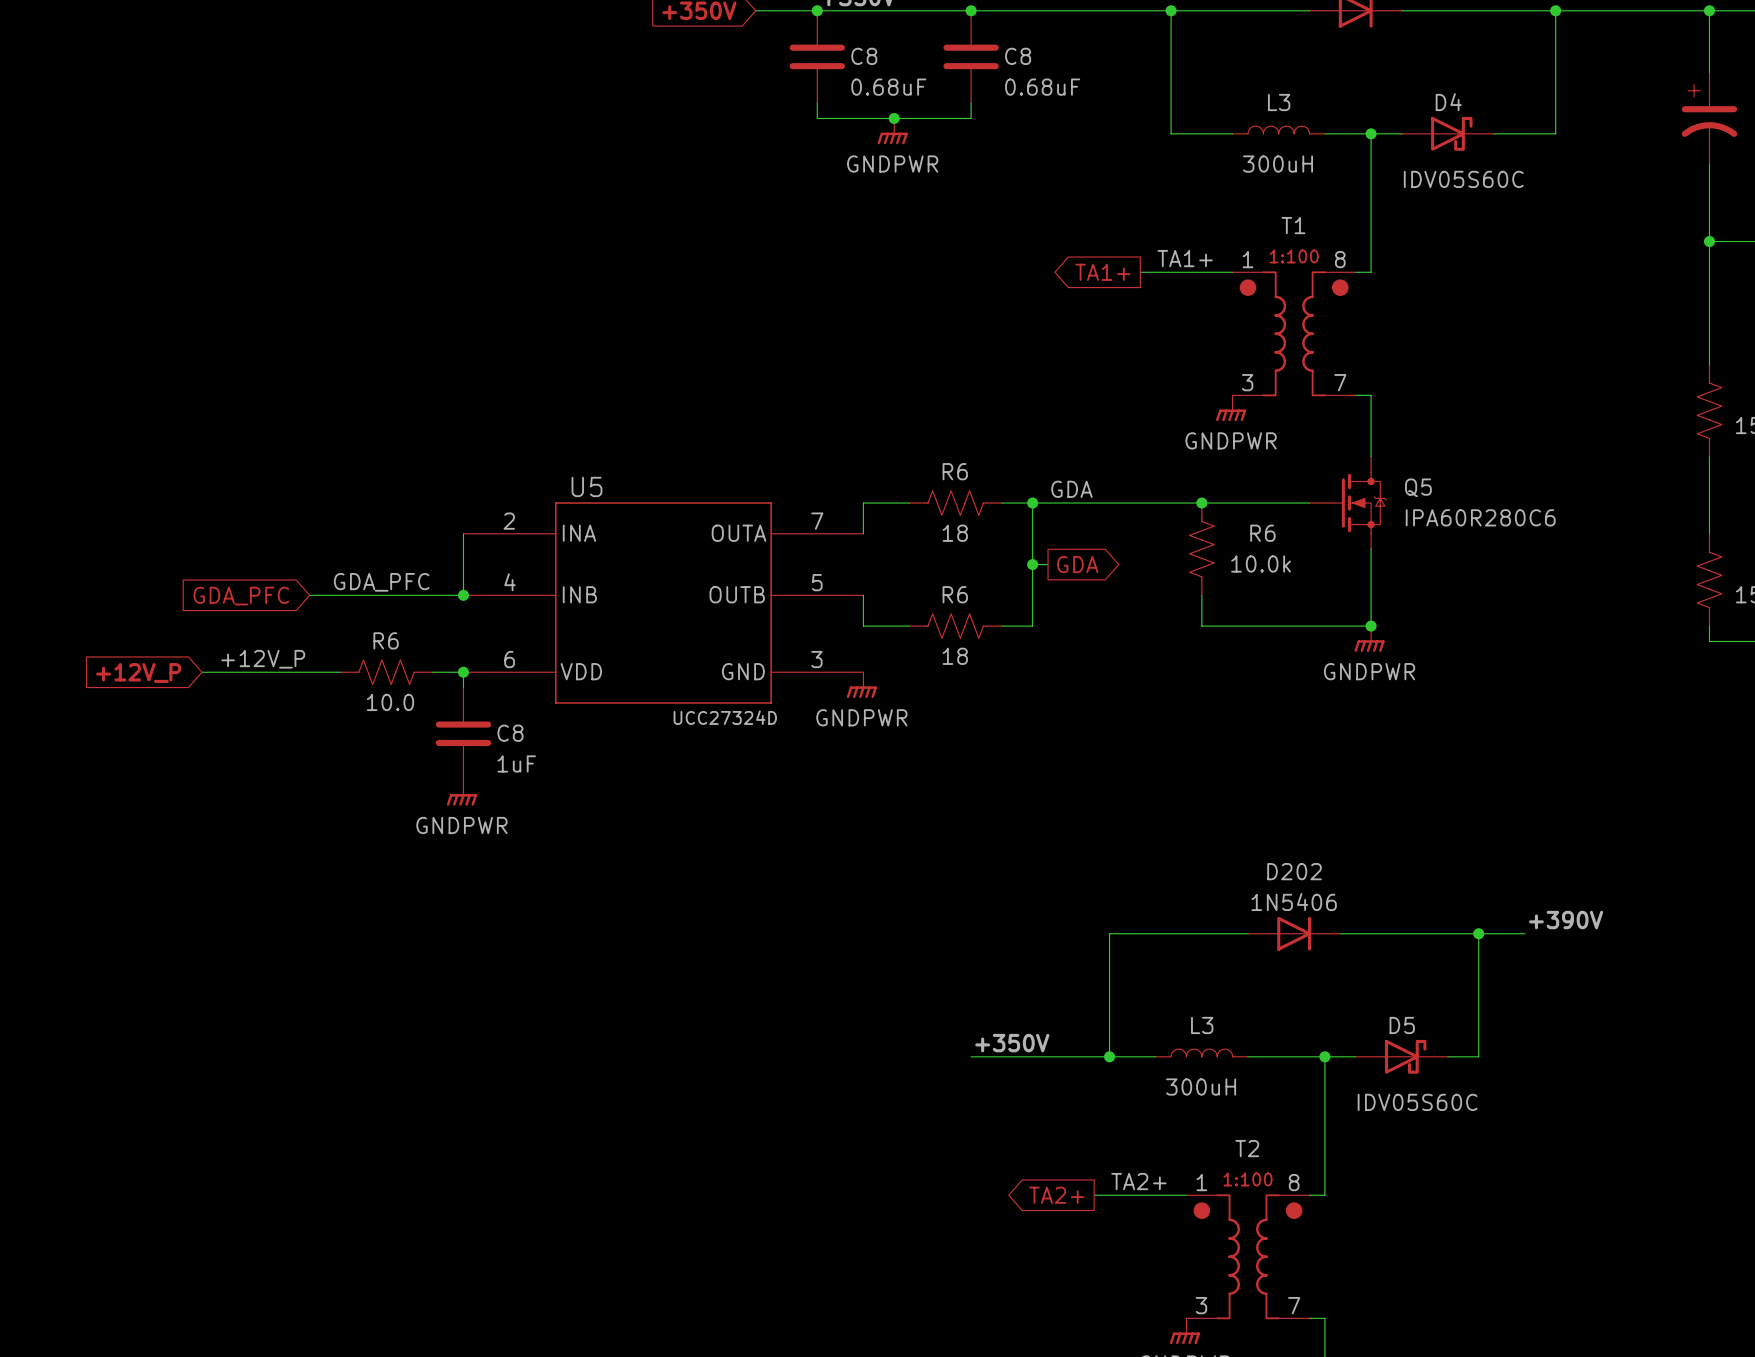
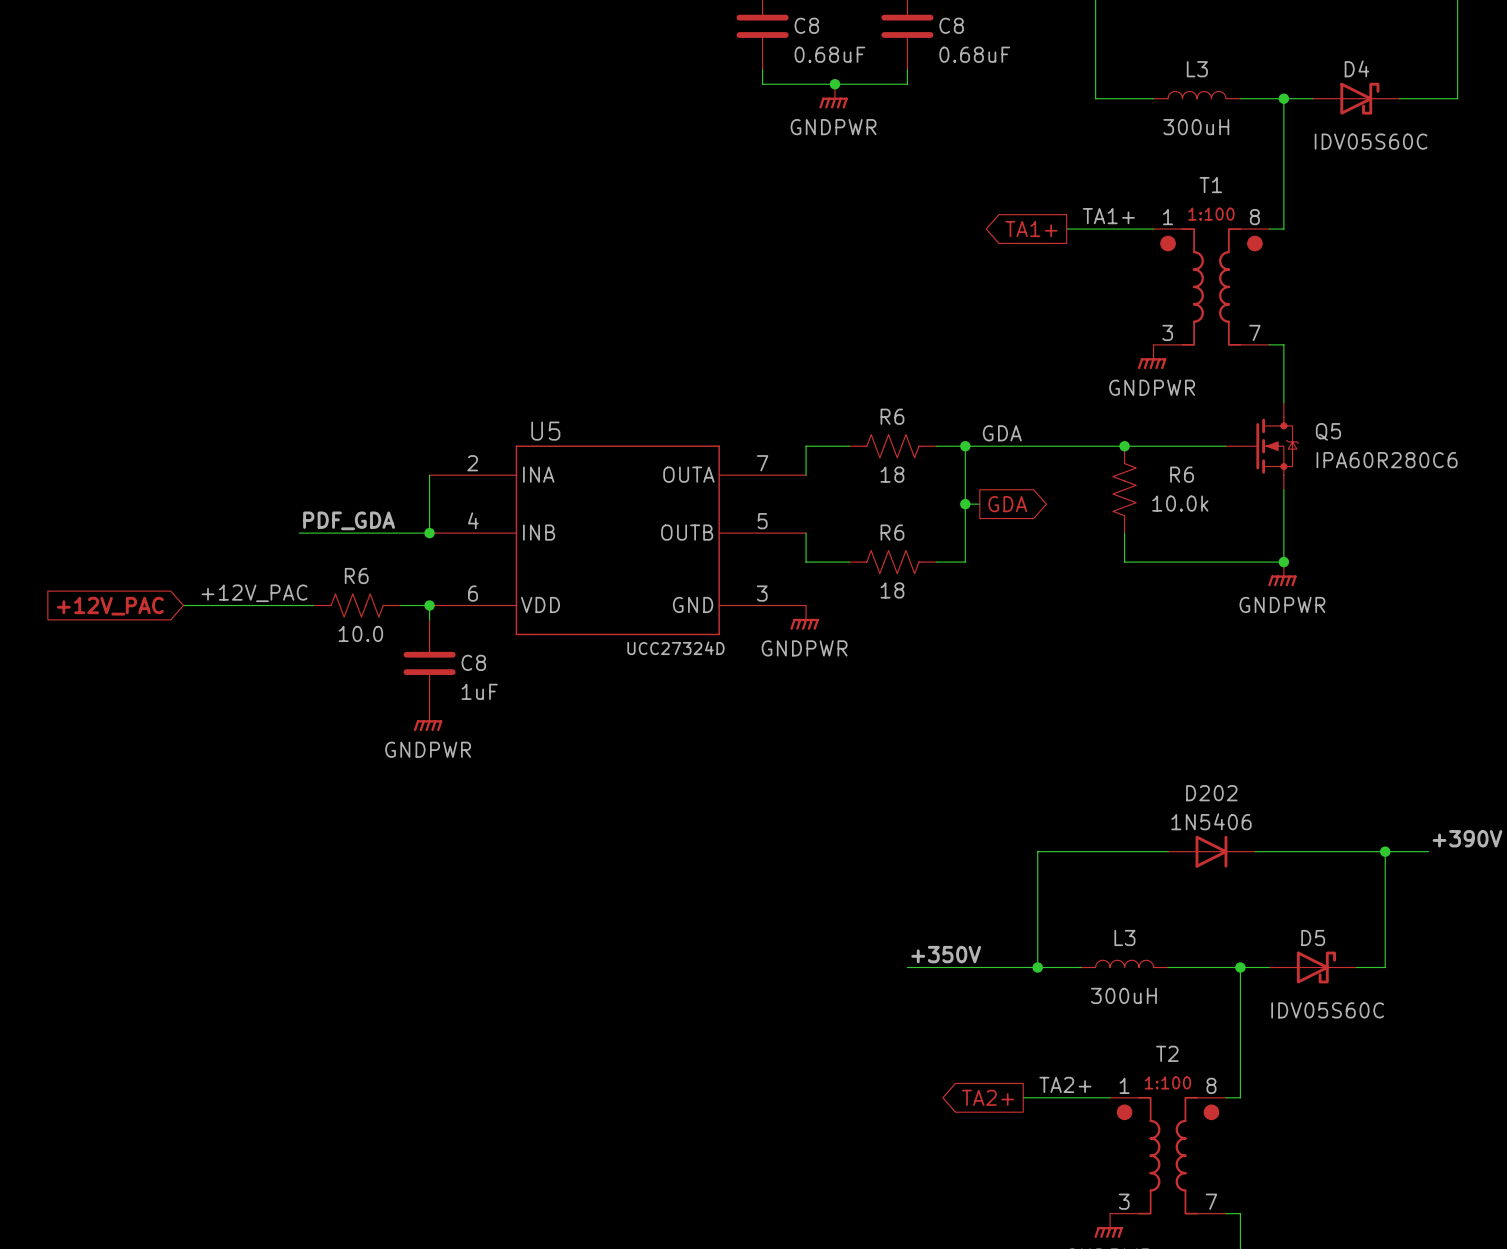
label: none -> PDF_GDA (349, 520)
label: GDA_PFC (381, 582) -> none
wire: (309, 595) (325, 595) -> none
global label: GDA_PFC (241, 596) -> none
label: +12V_P (263, 659) -> +12V_PAC (254, 593)
global label: +12V_P (138, 672) -> +12V_PAC (110, 606)

